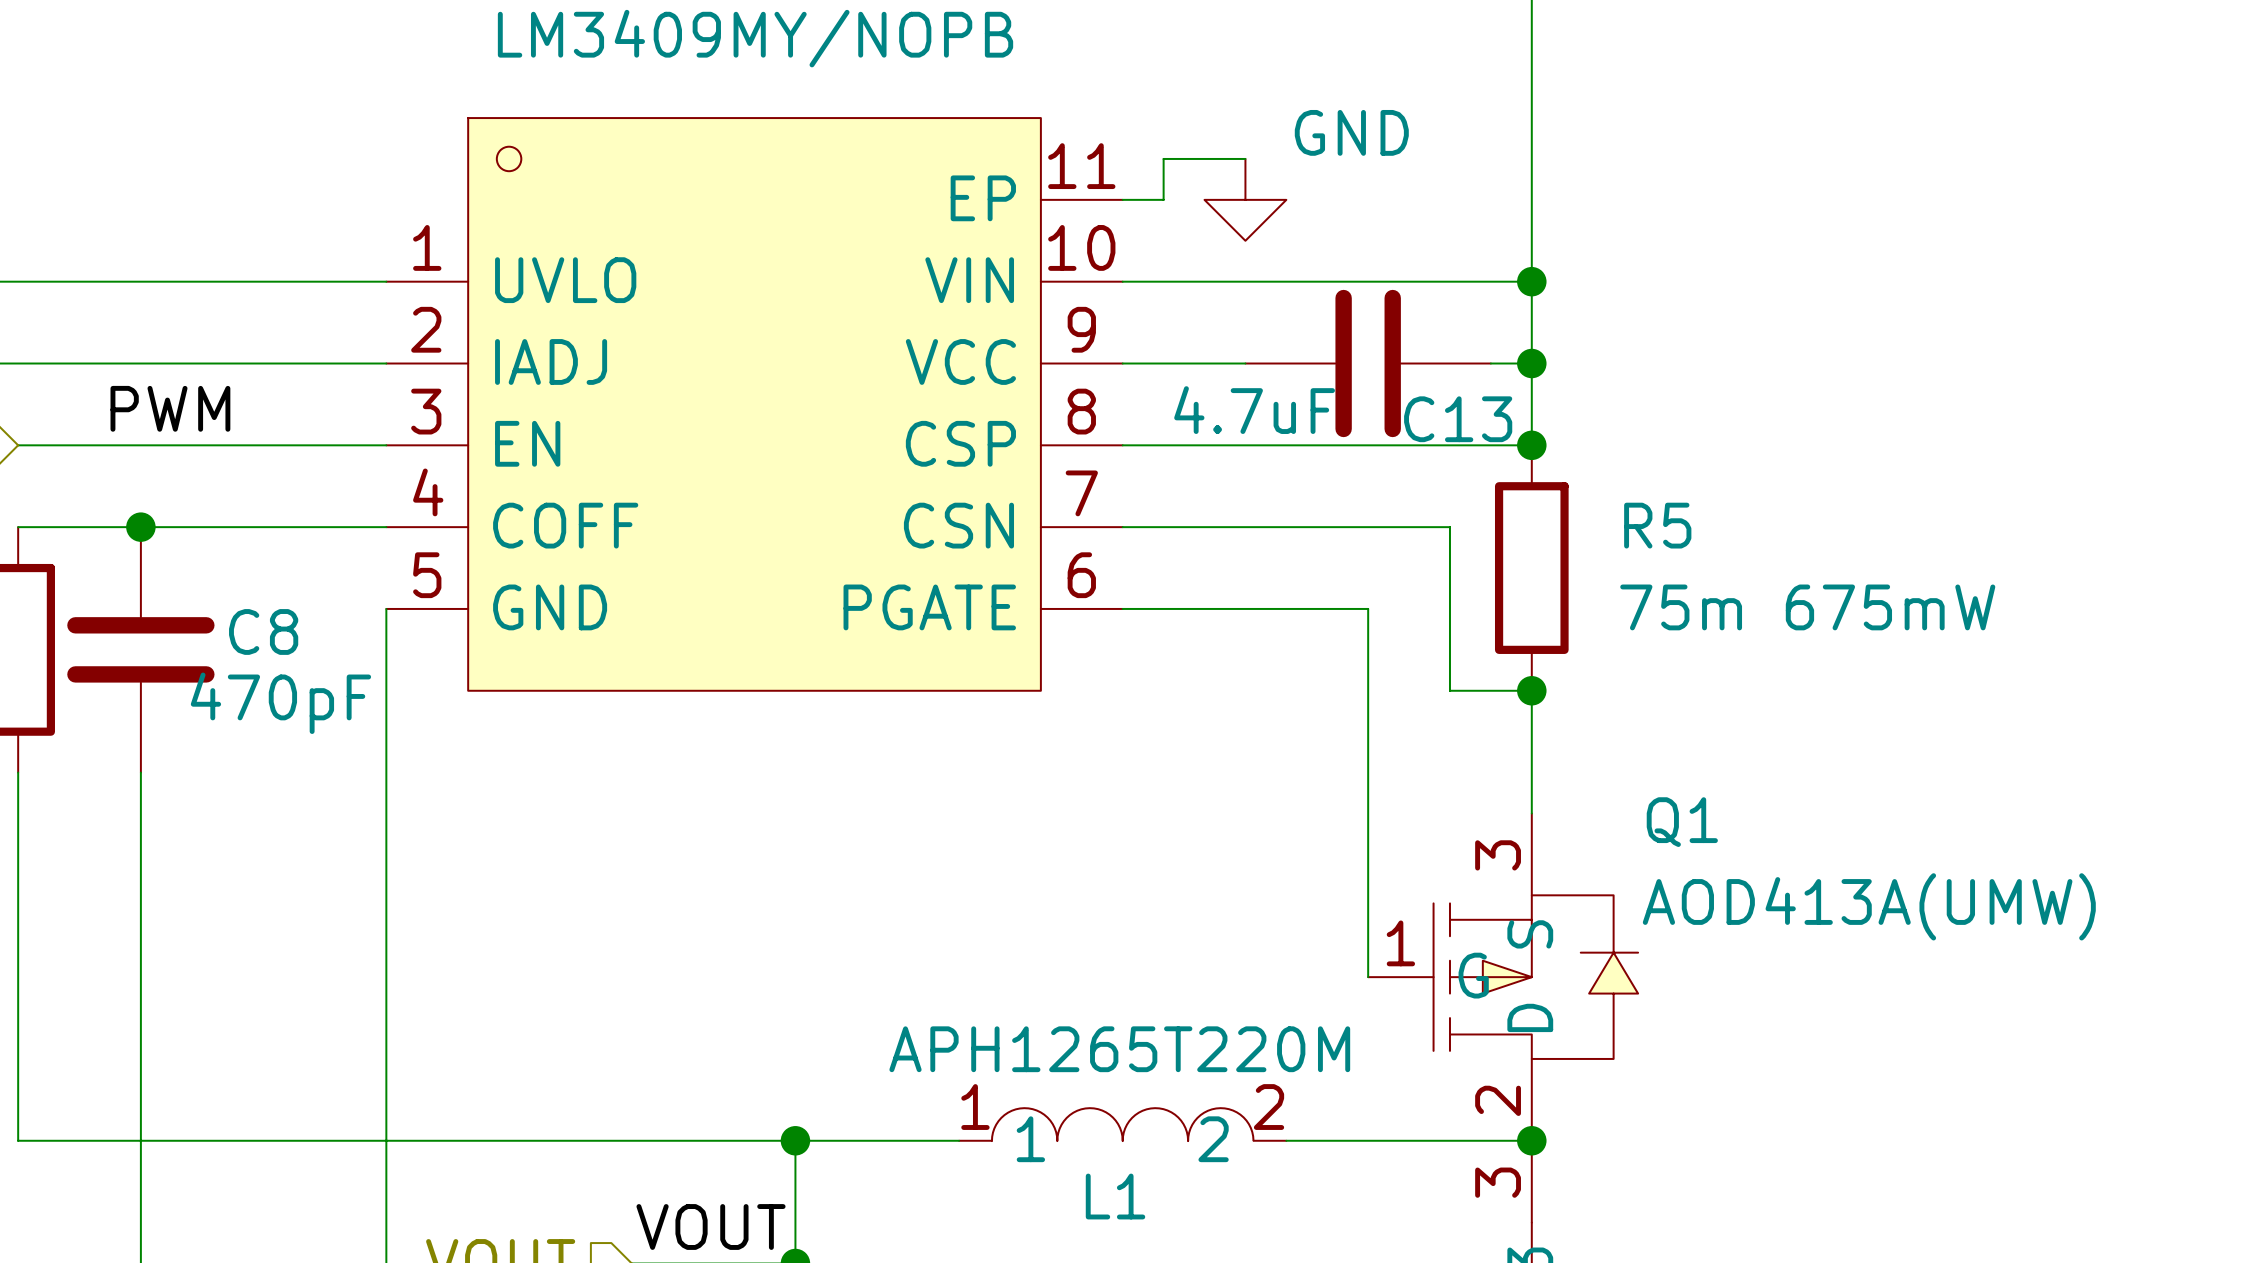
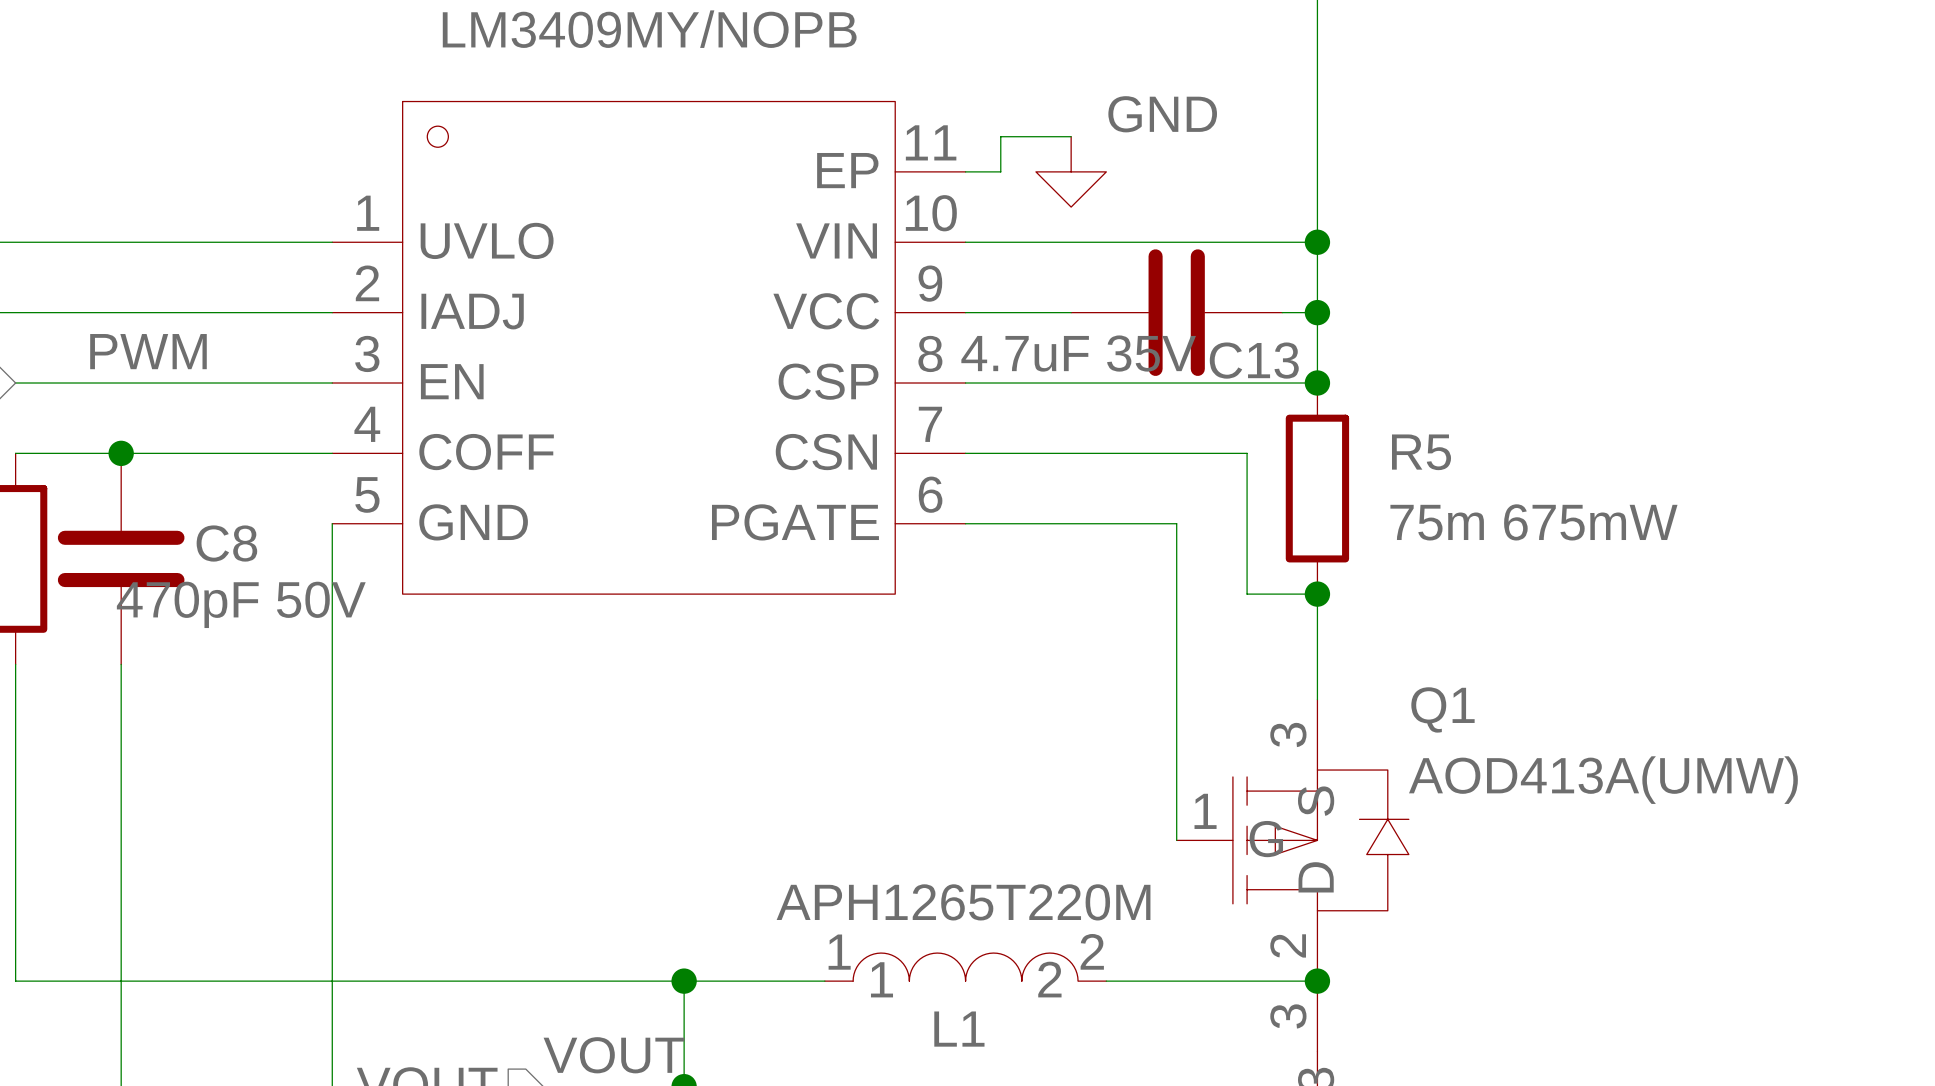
C13 value: 4.7uF (1254, 410) -> 4.7uF 35V (1078, 353)
C8 value: 470pF (280, 703) -> 470pF 50V (241, 604)

